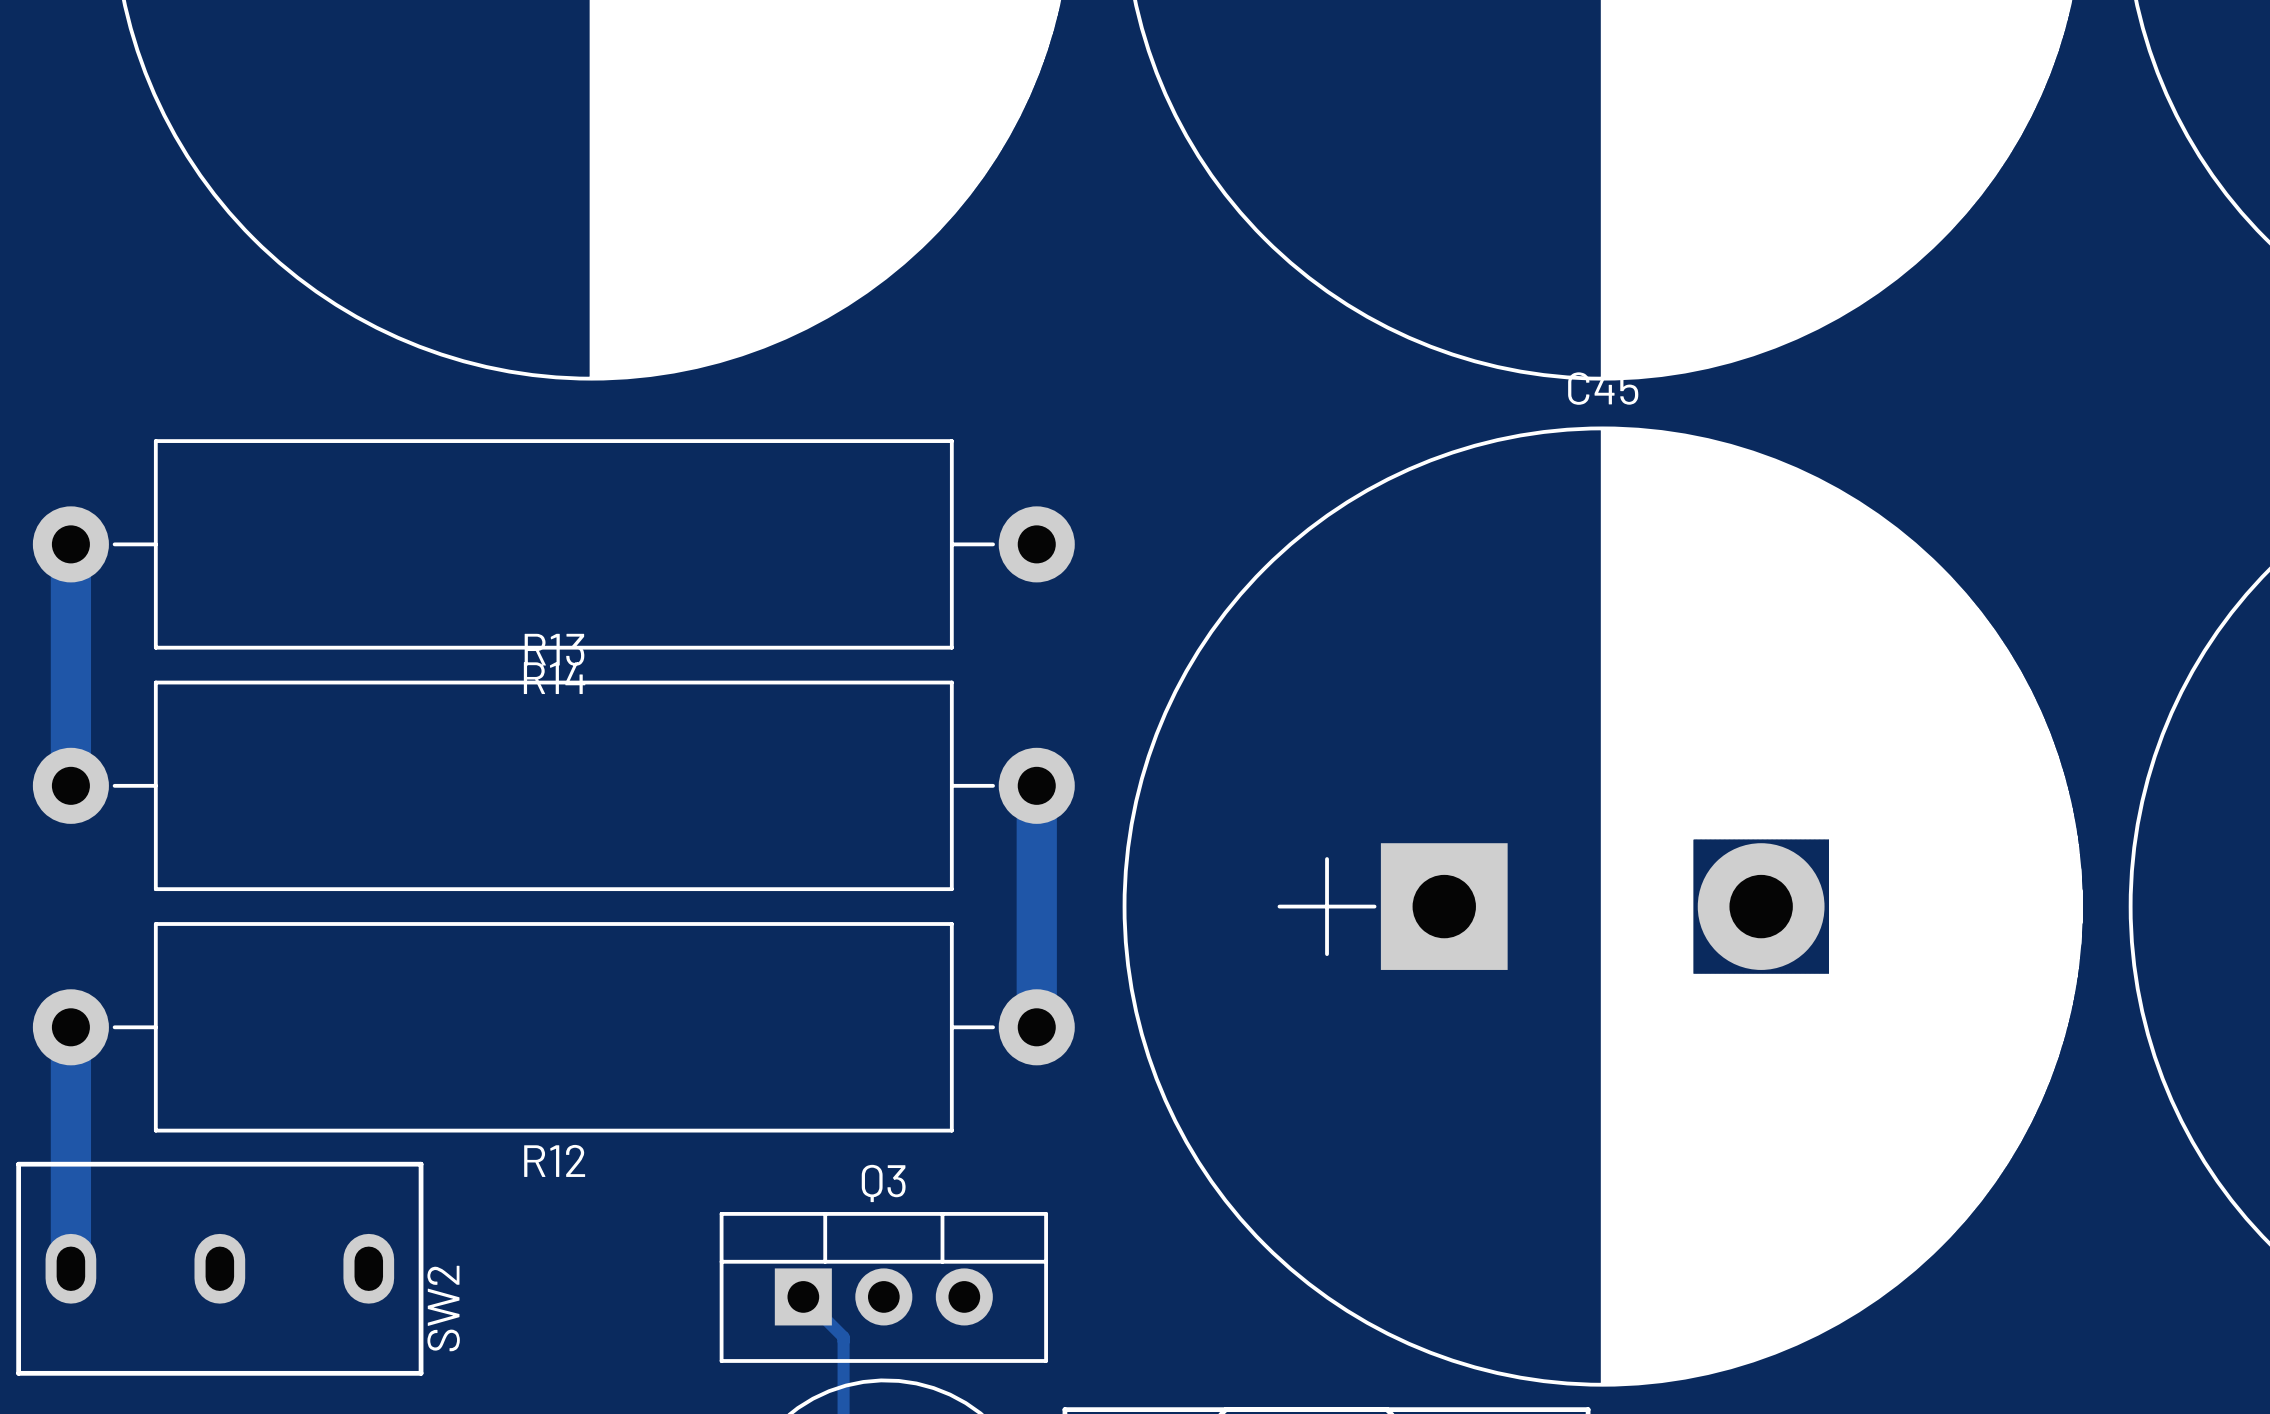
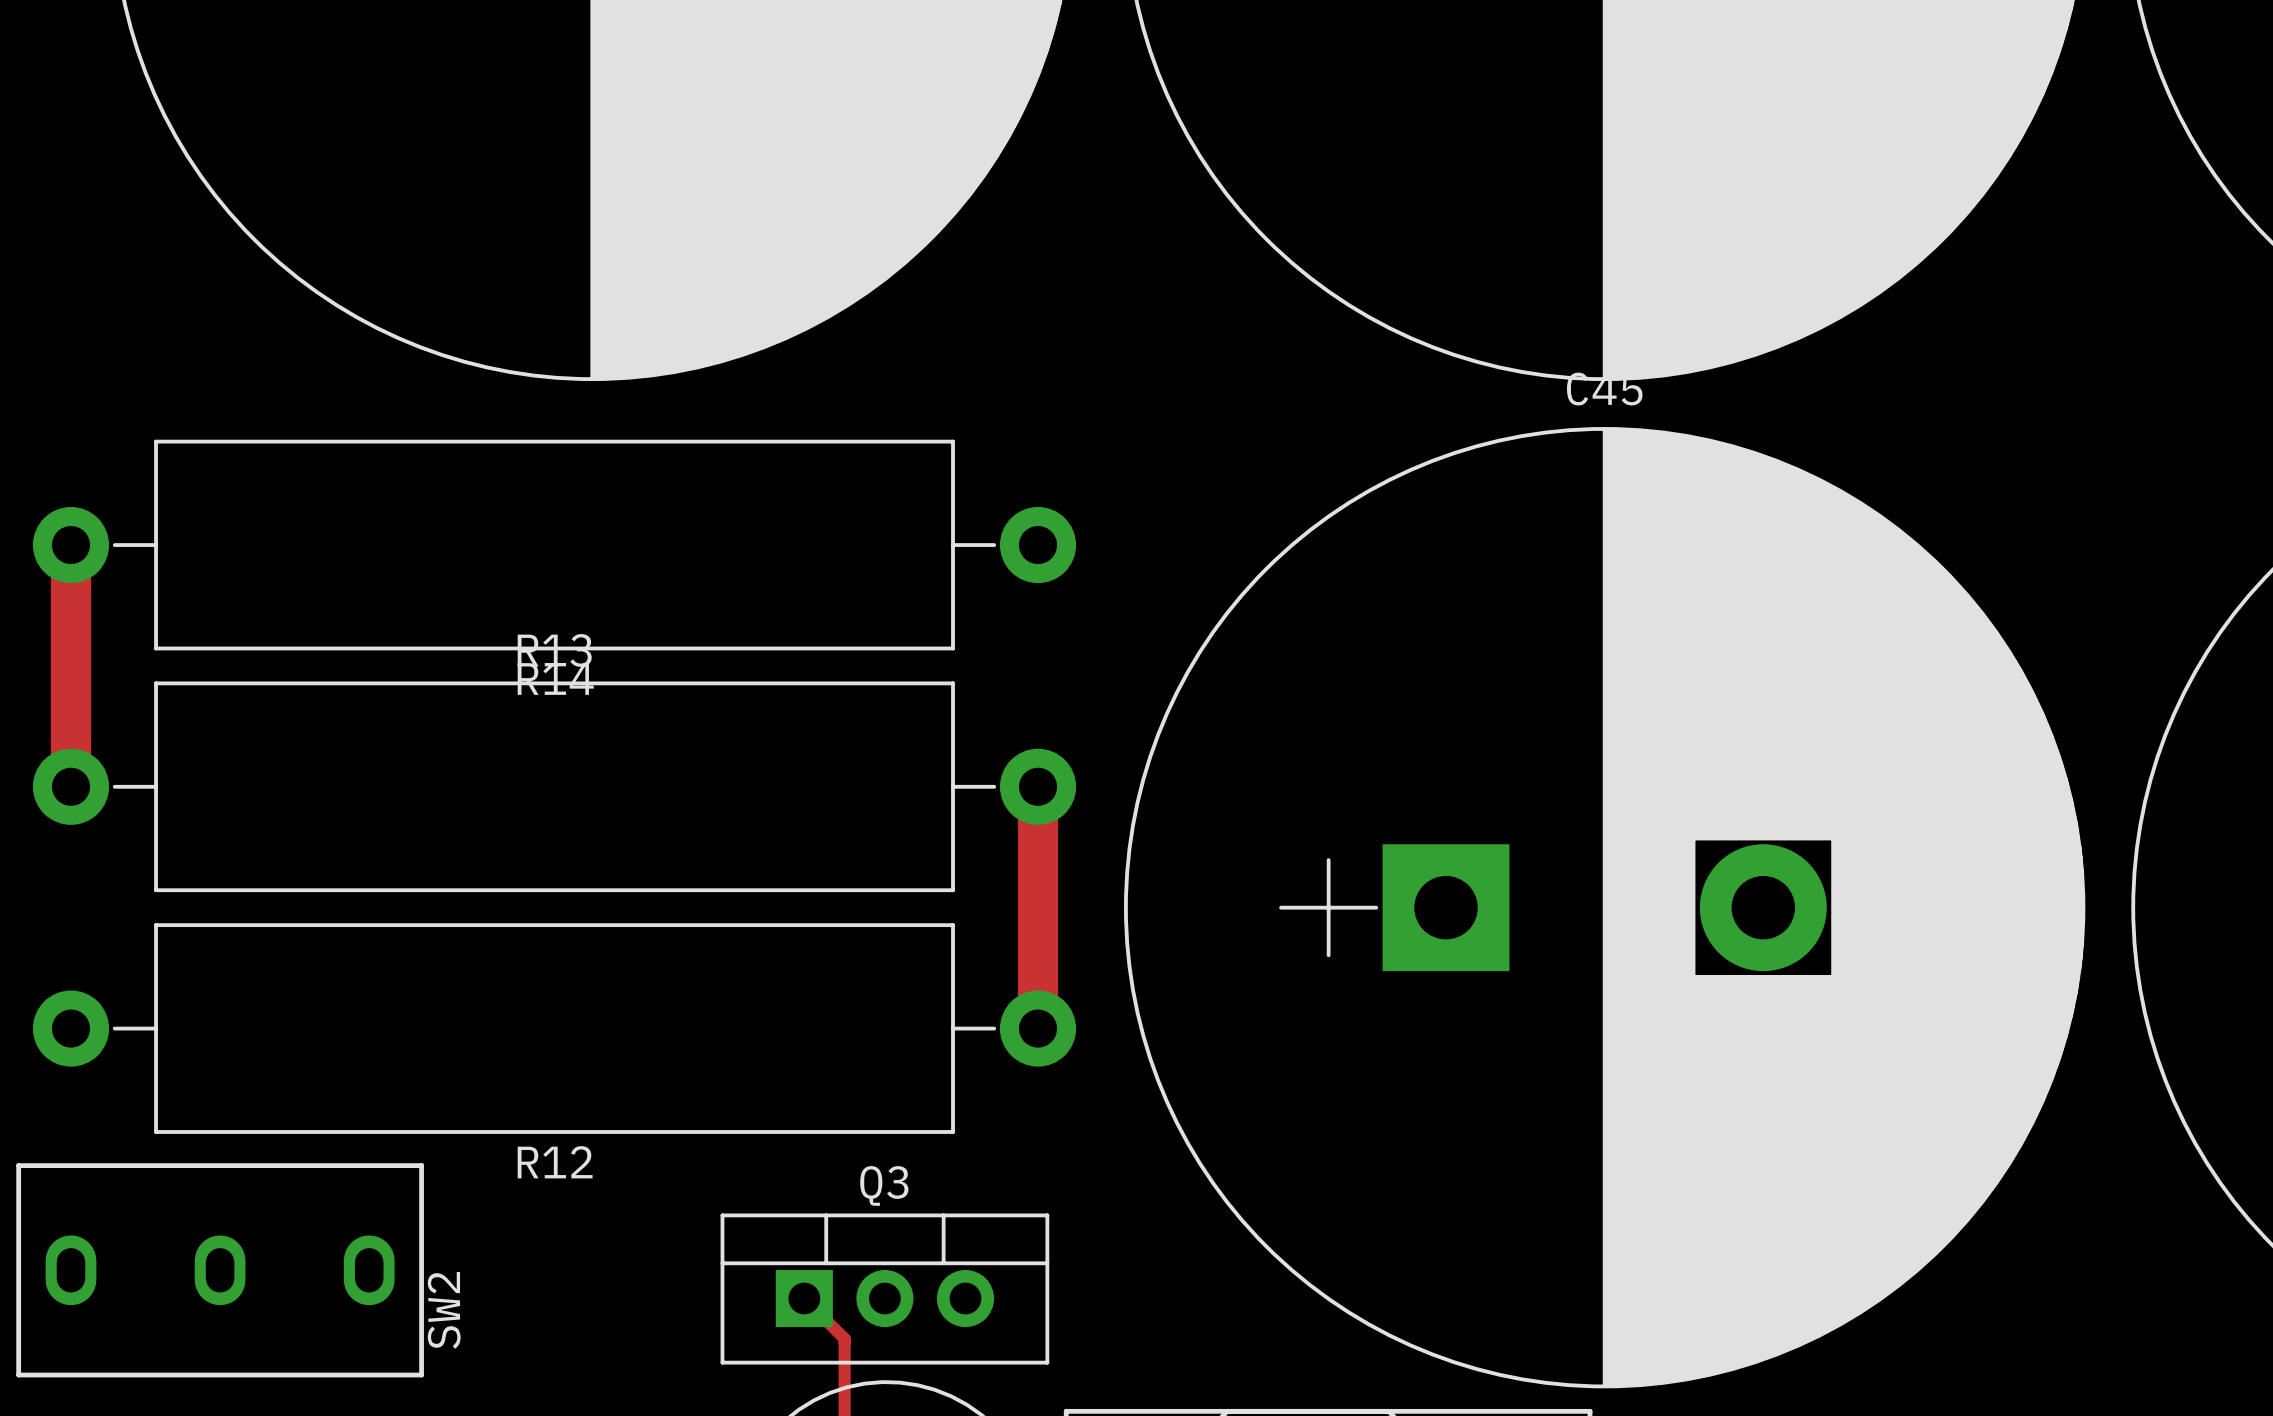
track: (70, 1027) (70, 1268) -> none

